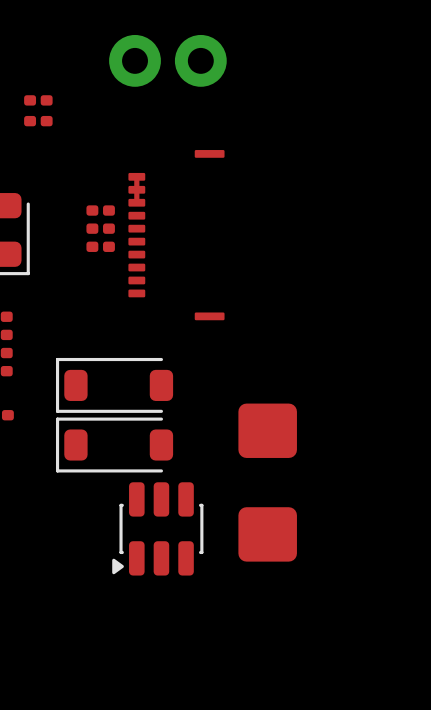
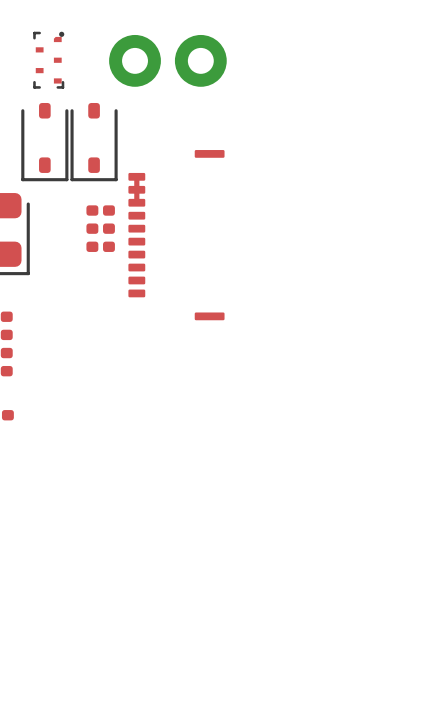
part: none -> (48, 60)
part: (38, 100) -> none
part: (38, 121) -> none
part: none -> (44, 142)
part: none -> (94, 142)
part: (114, 385) -> none
part: (114, 445) -> none
part: (267, 482) -> none
part: (157, 528) -> none

